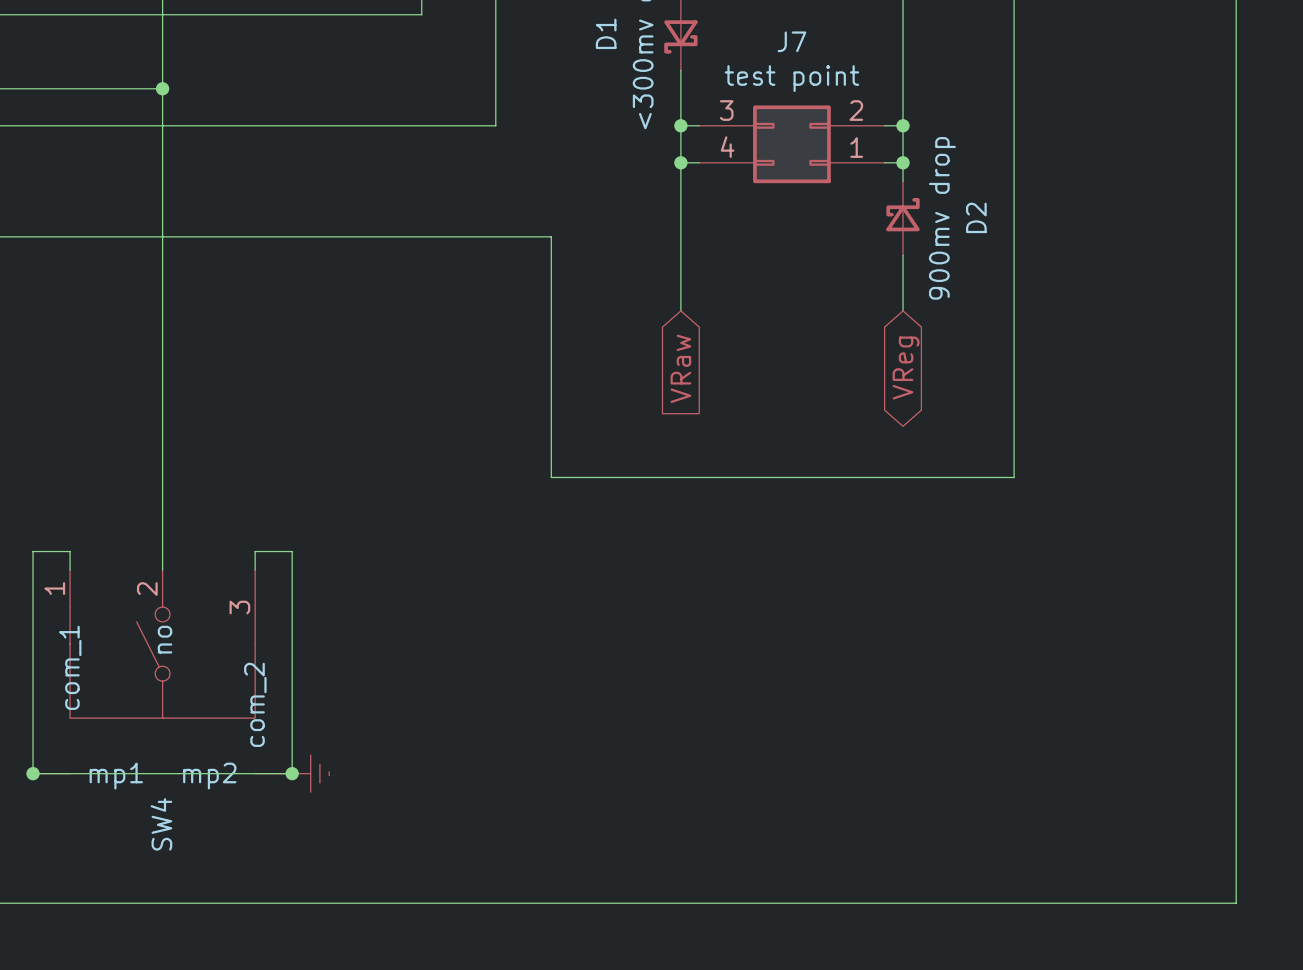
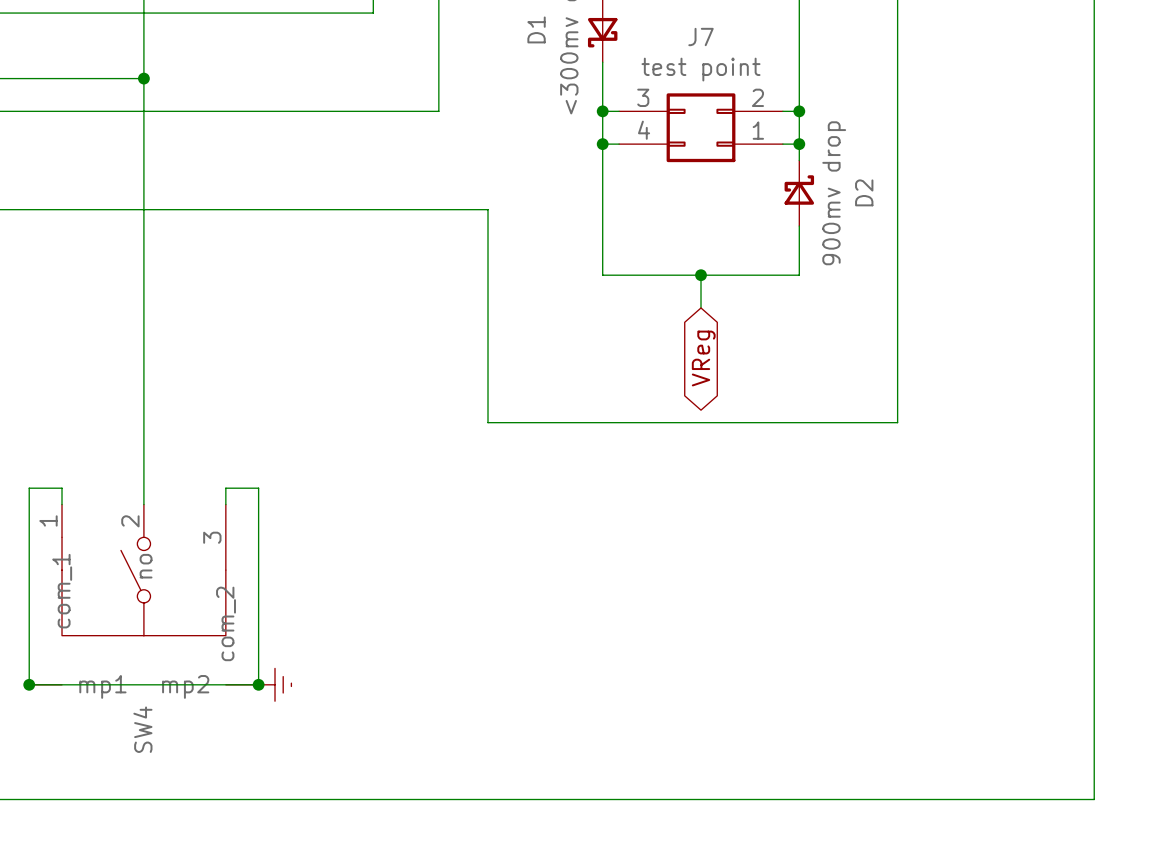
wire: none -> (602, 275) (799, 275)
wire: none -> (701, 275) (701, 307)
junction: none -> (701, 275)
global label: VRaw (680, 368) -> none
global label position: VReg (906, 368) -> VReg (703, 358)

